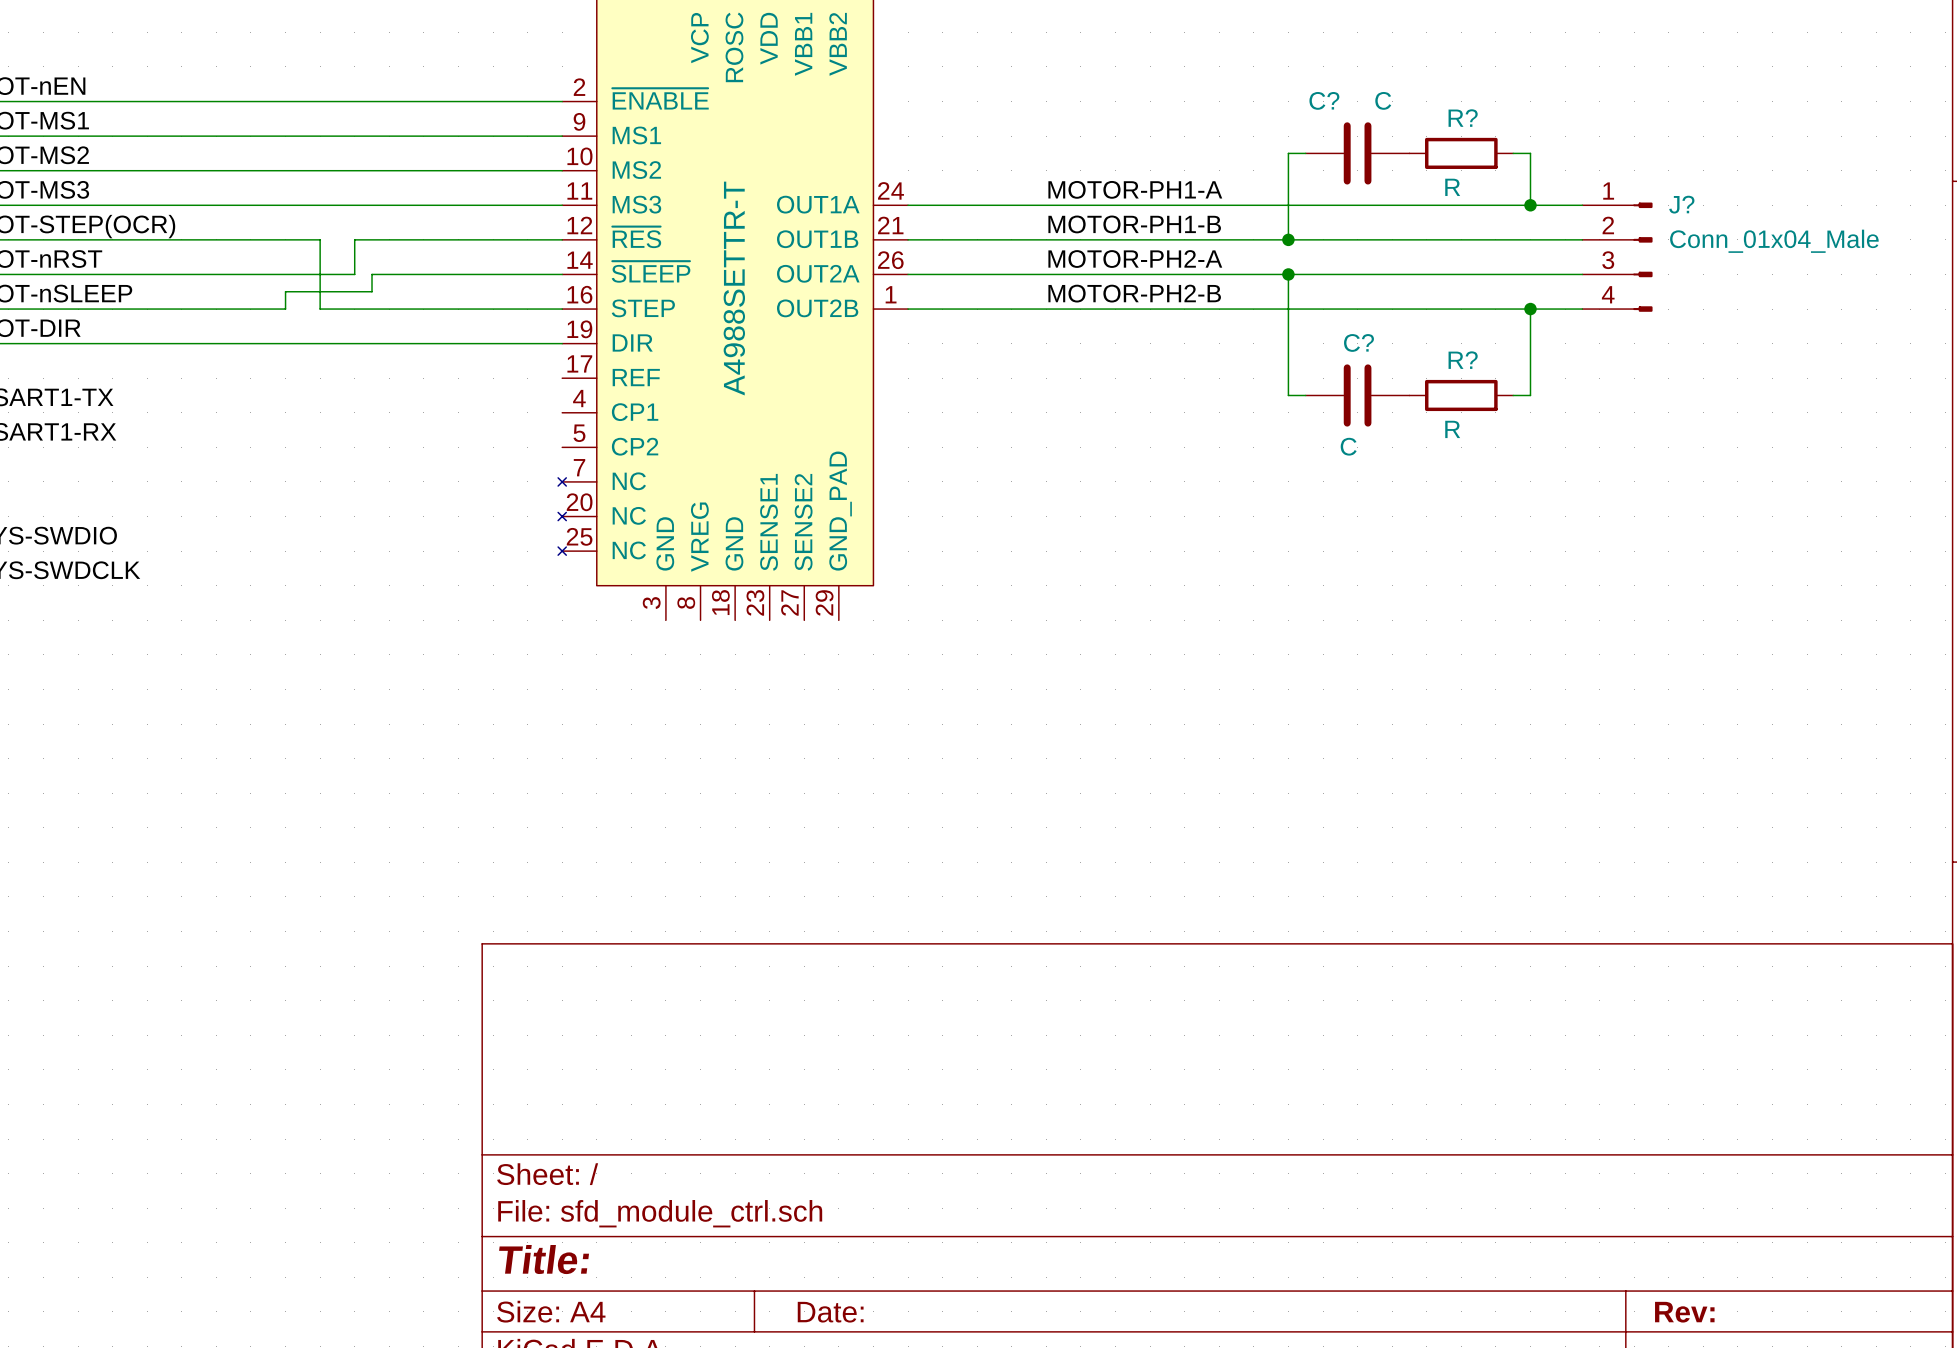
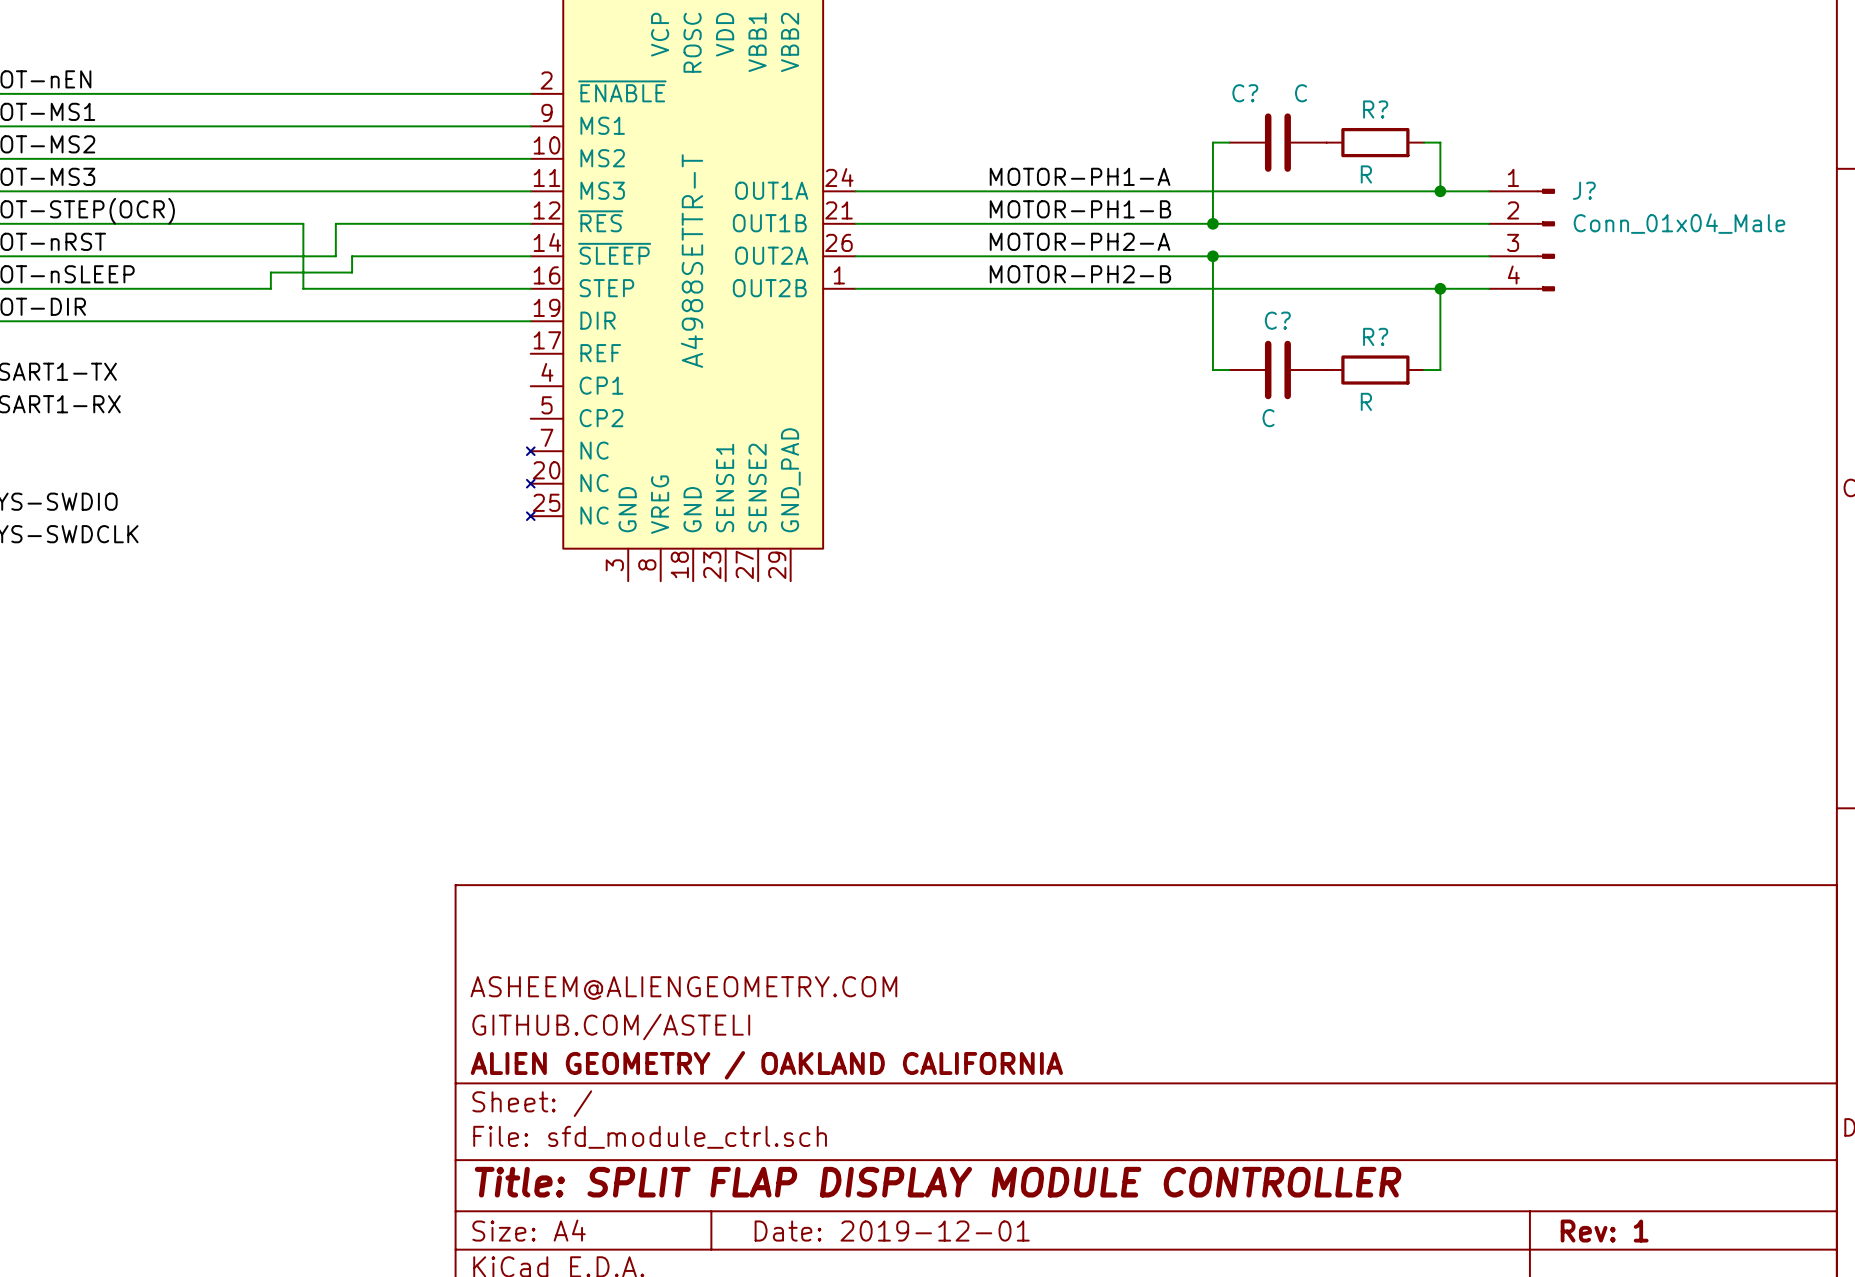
title block: none -> ASHEEM@ALIENGEOMETRY.COM (683, 988)
title block: none -> GITHUB.COM/ASTELI (611, 1026)
title block: none -> ALIEN GEOMETRY / OAKLAND CALIFORNIA (766, 1065)
title block: Title: (544, 1259) -> Title: SPLIT FLAP DISPLAY MODULE CONTROLLER (938, 1182)
title block: Date: (830, 1312) -> Date: 2019-12-01 (892, 1231)
title block: Rev: (1684, 1312) -> Rev: 1 (1604, 1231)

